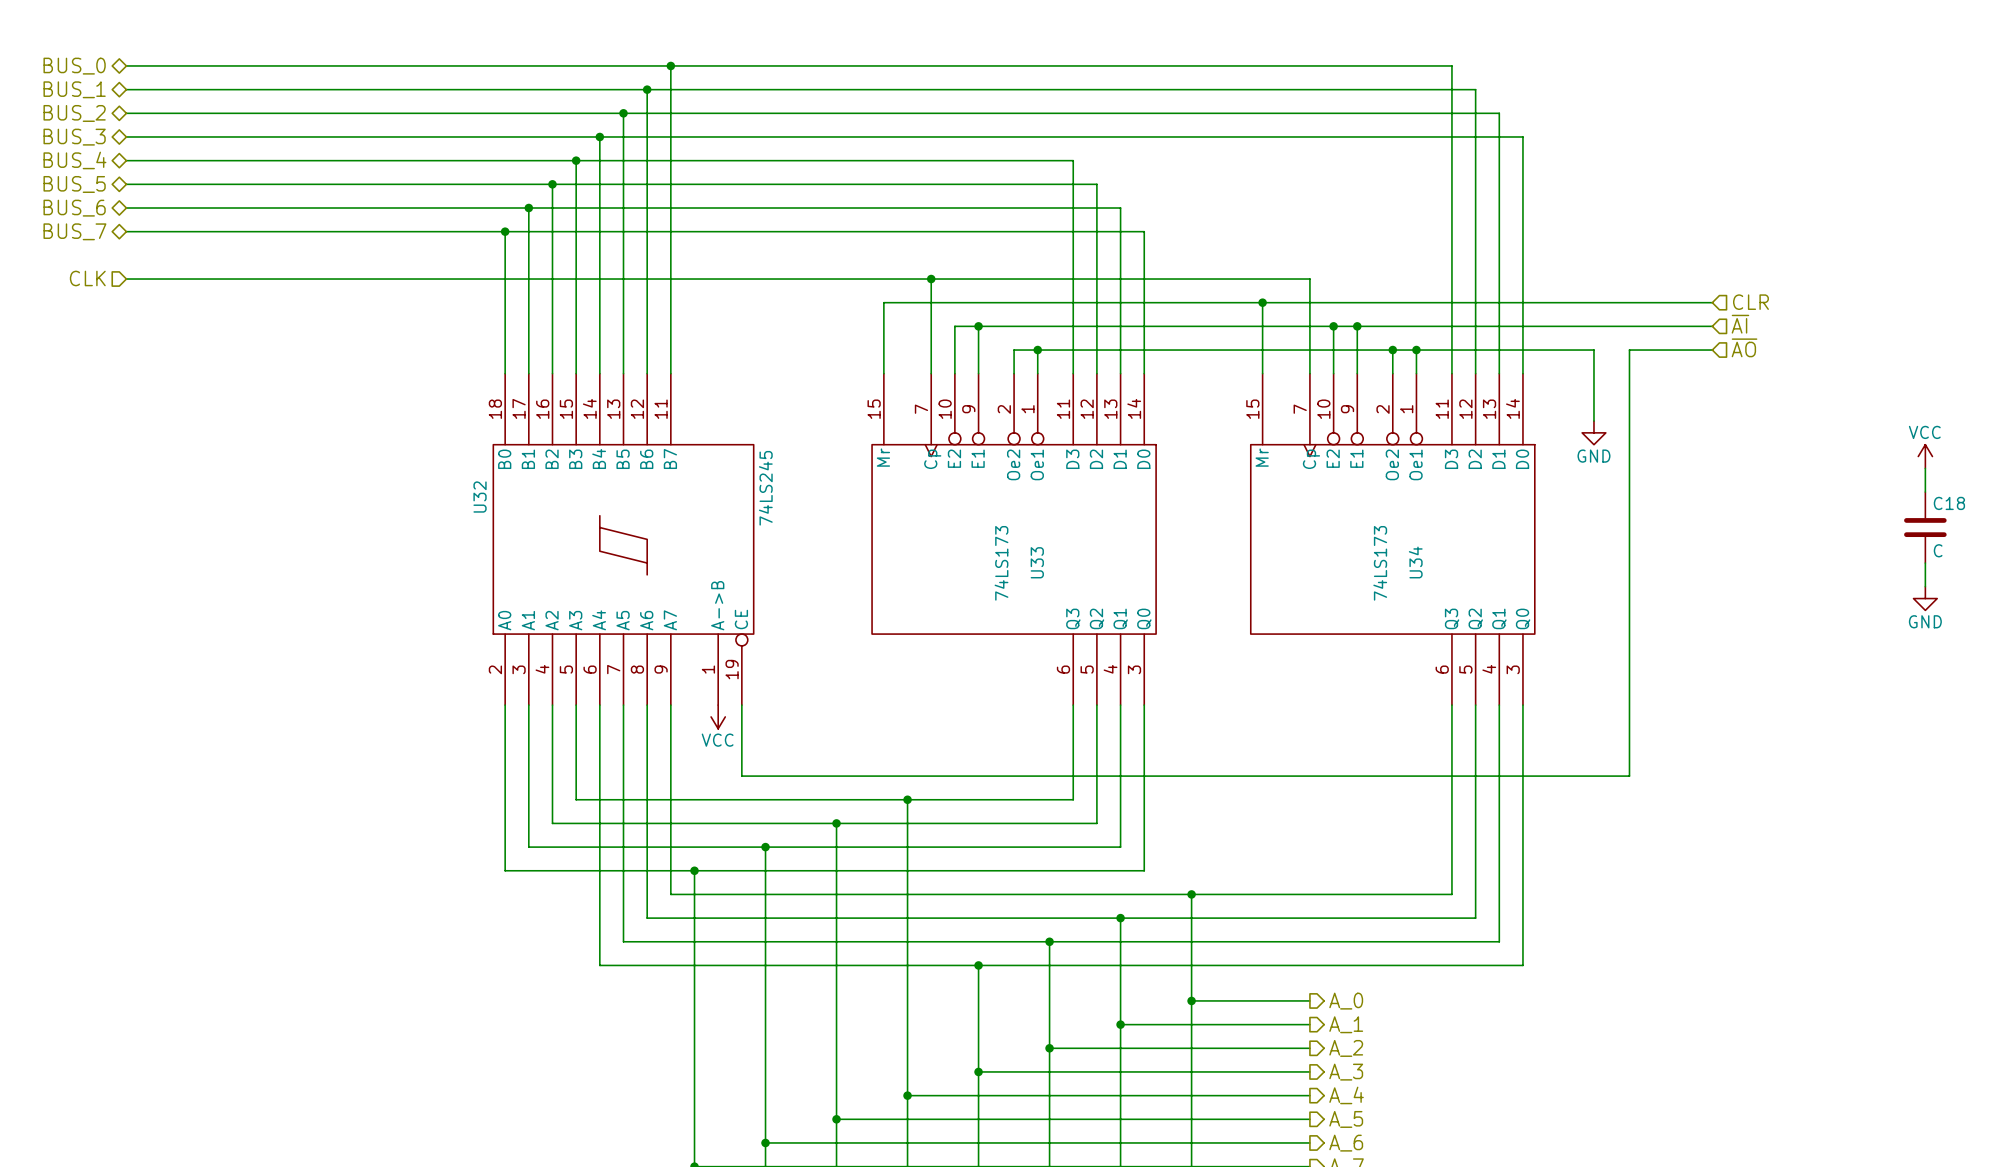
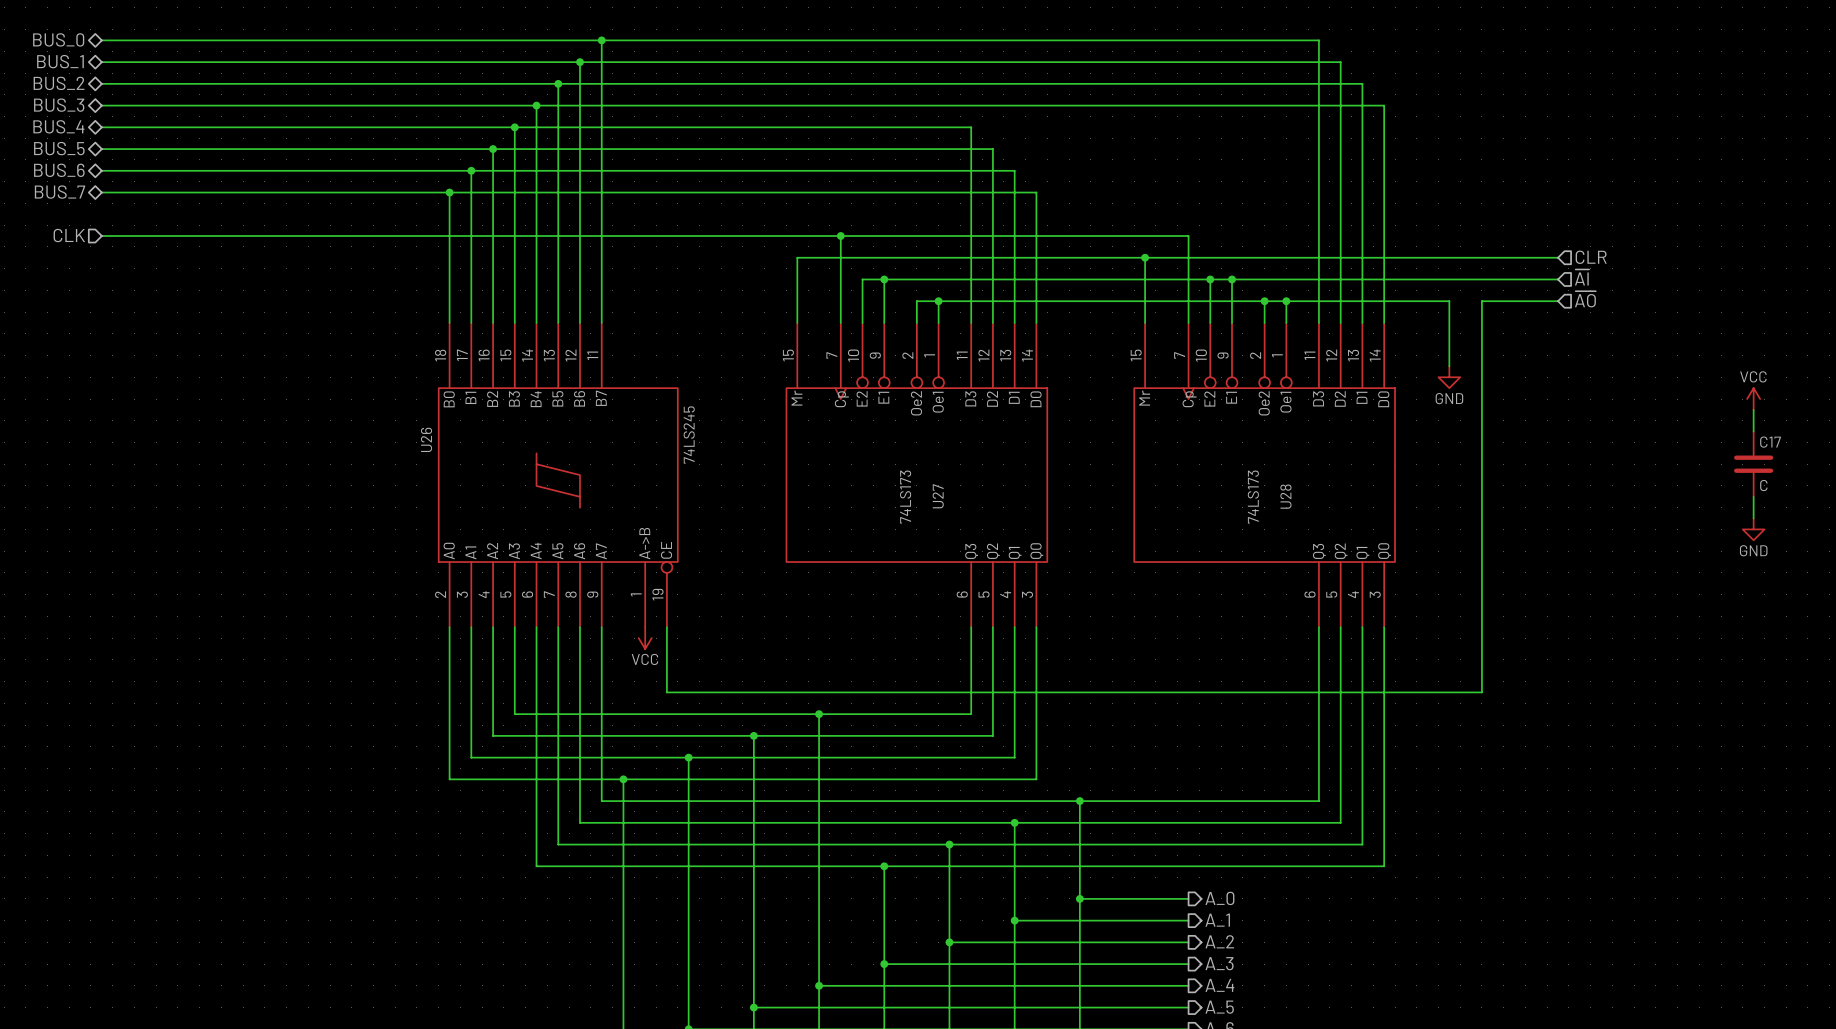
U32 name: U32 (480, 497) -> U26 (426, 439)
C18 name: C18 (1949, 503) -> C17 (1770, 442)
U33 name: U33 (1037, 562) -> U27 (938, 496)
U34 name: U34 (1415, 562) -> U28 (1285, 496)

